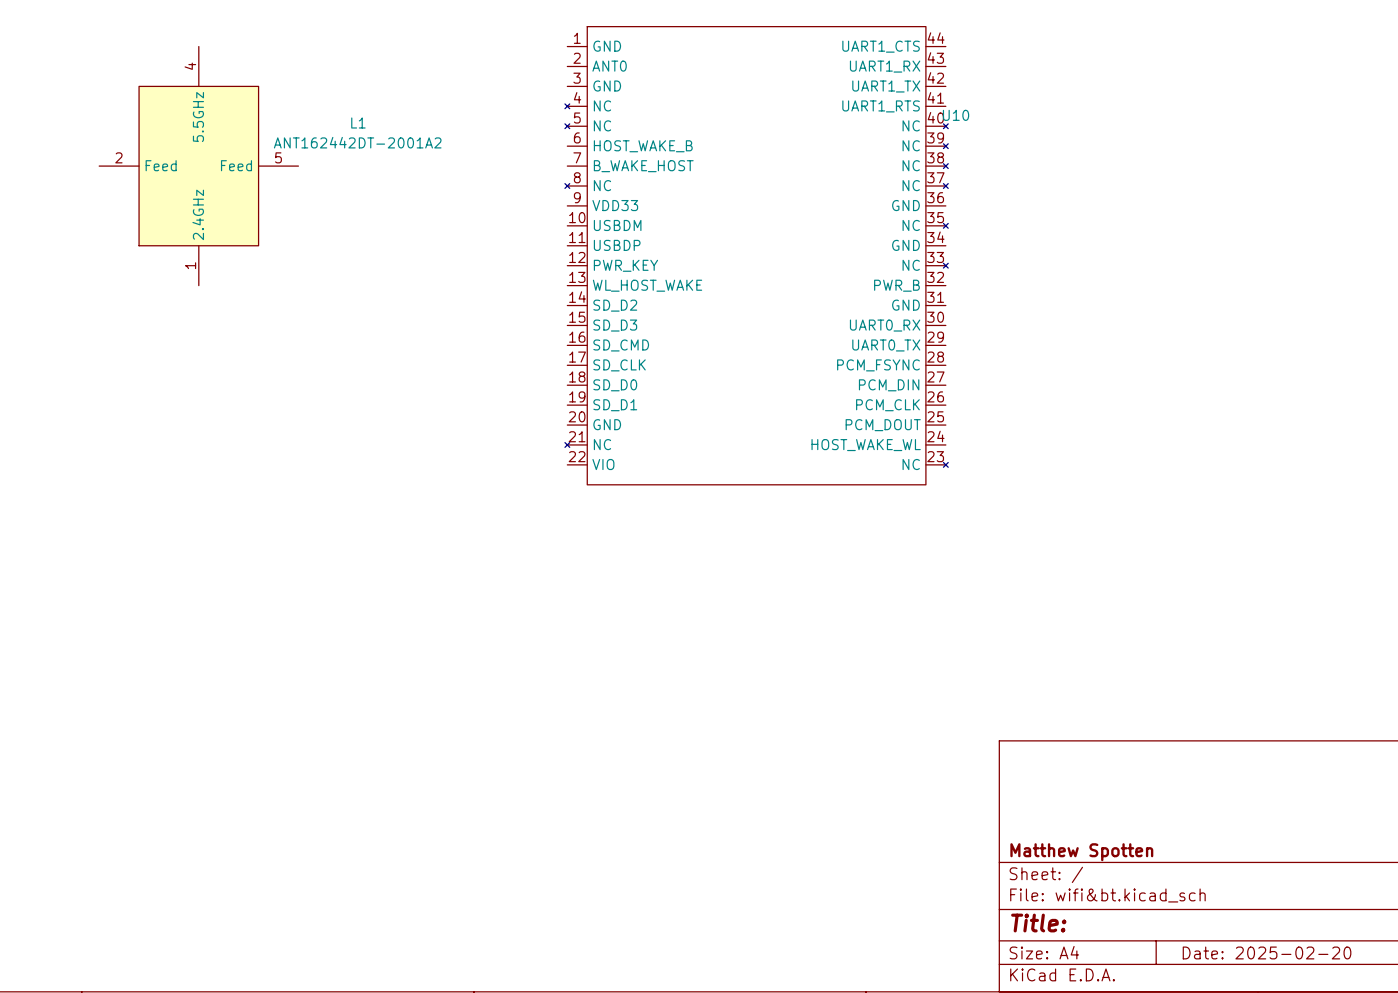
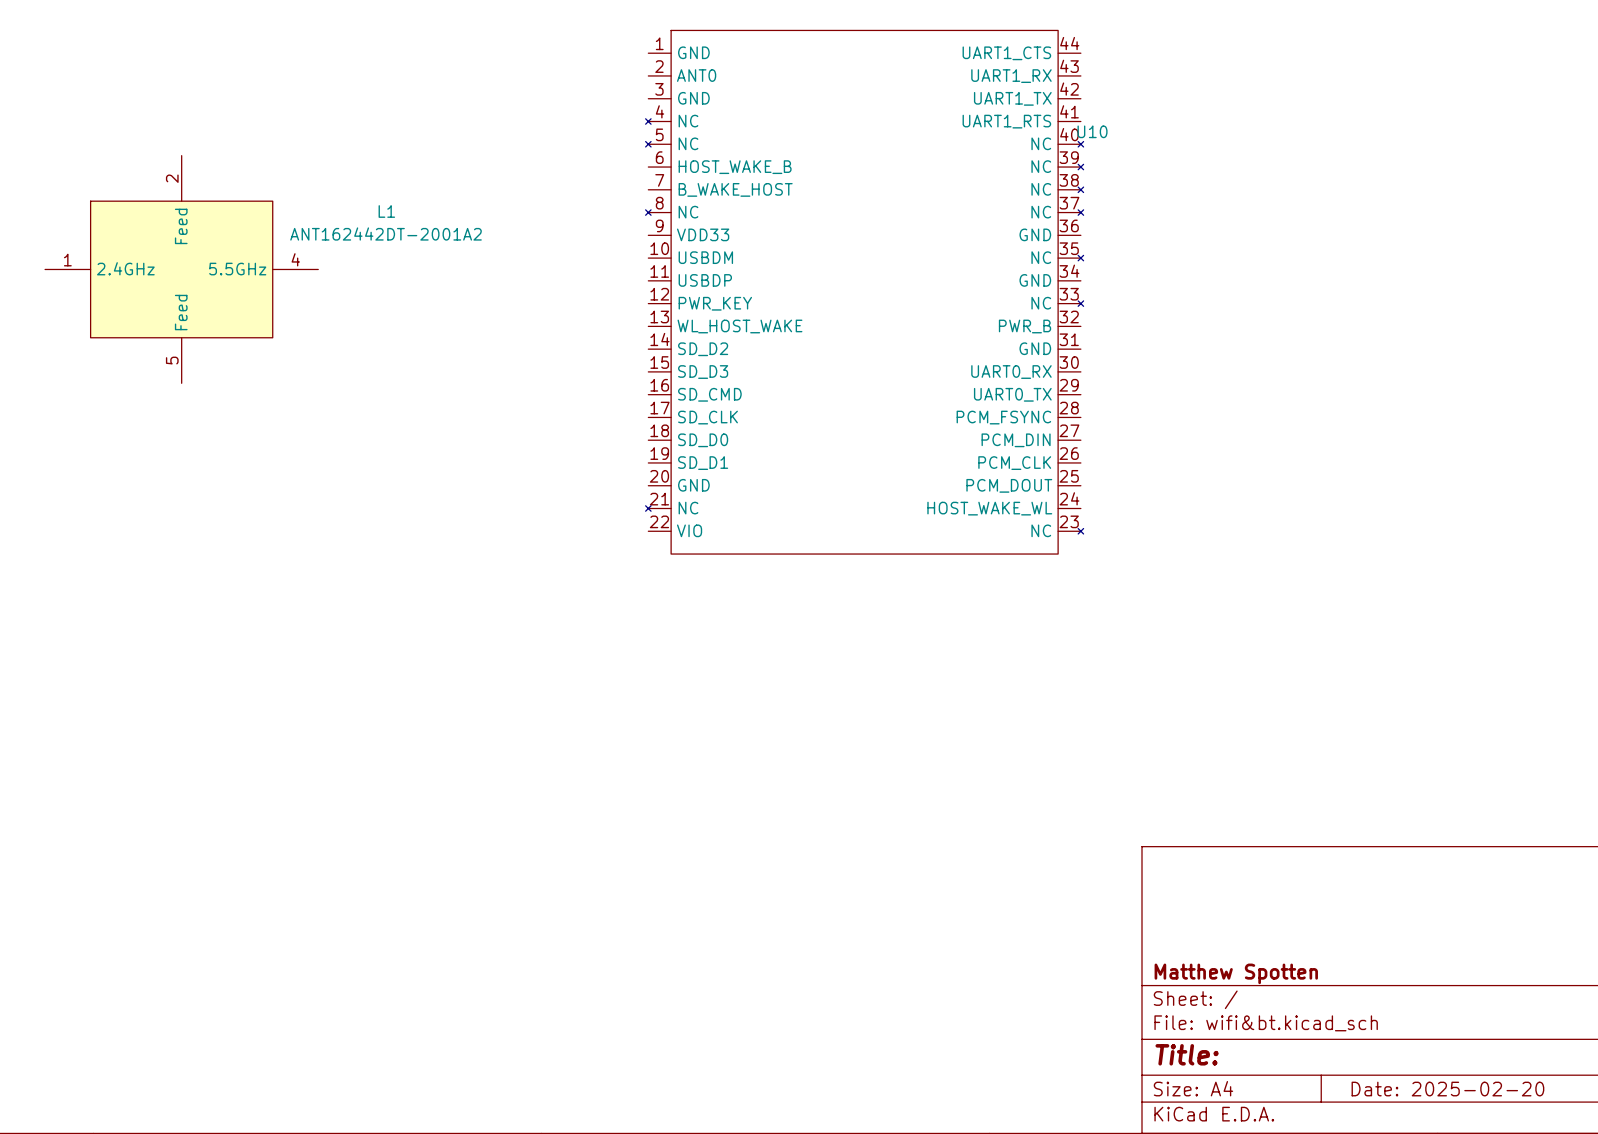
L1 name position: L1 (358, 123) -> L1 (386, 211)
L1 value position: ANT162442DT-2001A2 (357, 142) -> ANT162442DT-2001A2 (386, 233)
L1 rotation: 0° (198, 166) -> 90° clockwise (181, 269)

